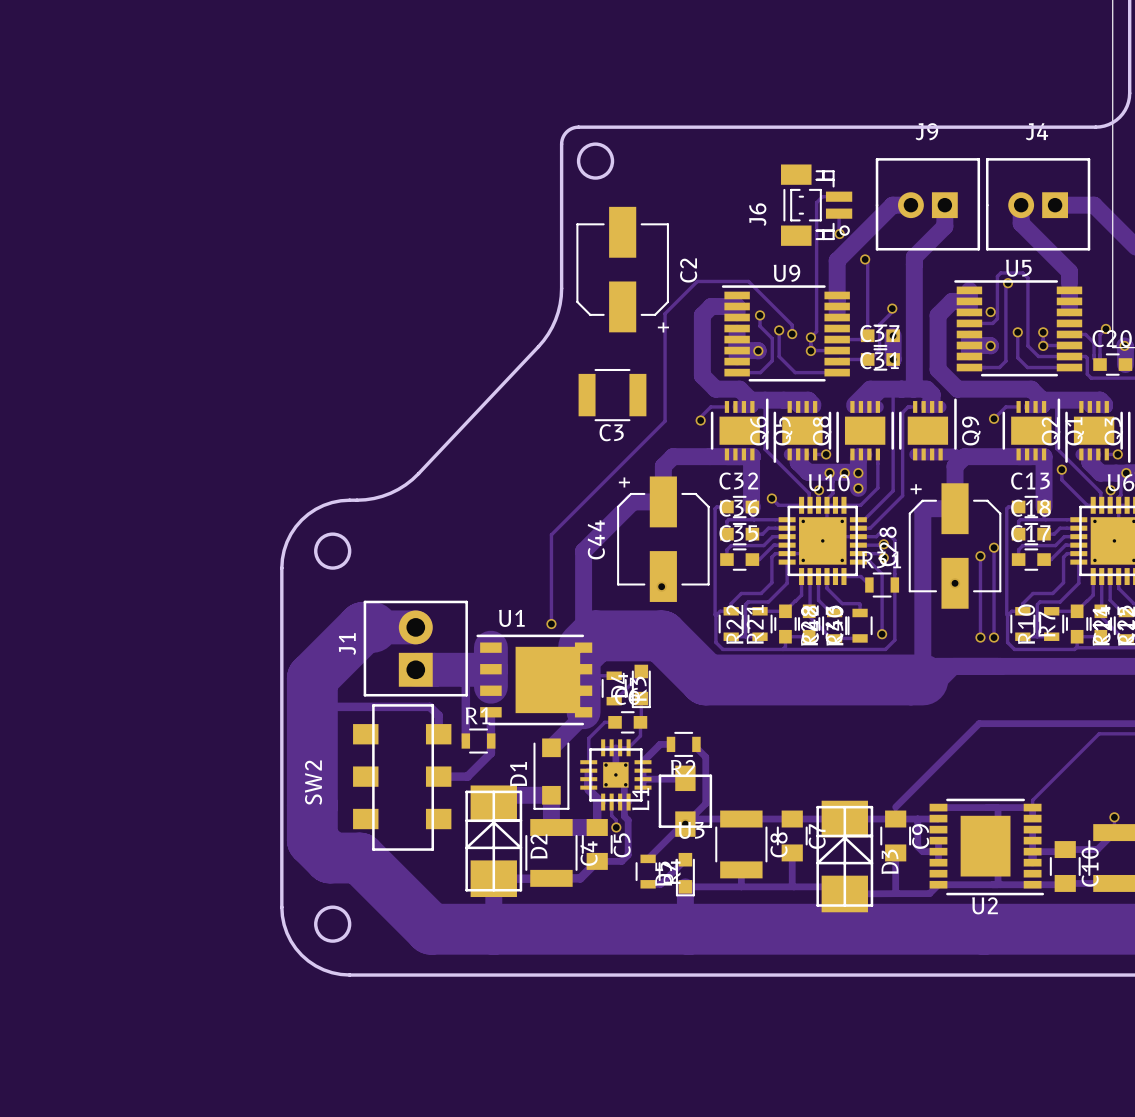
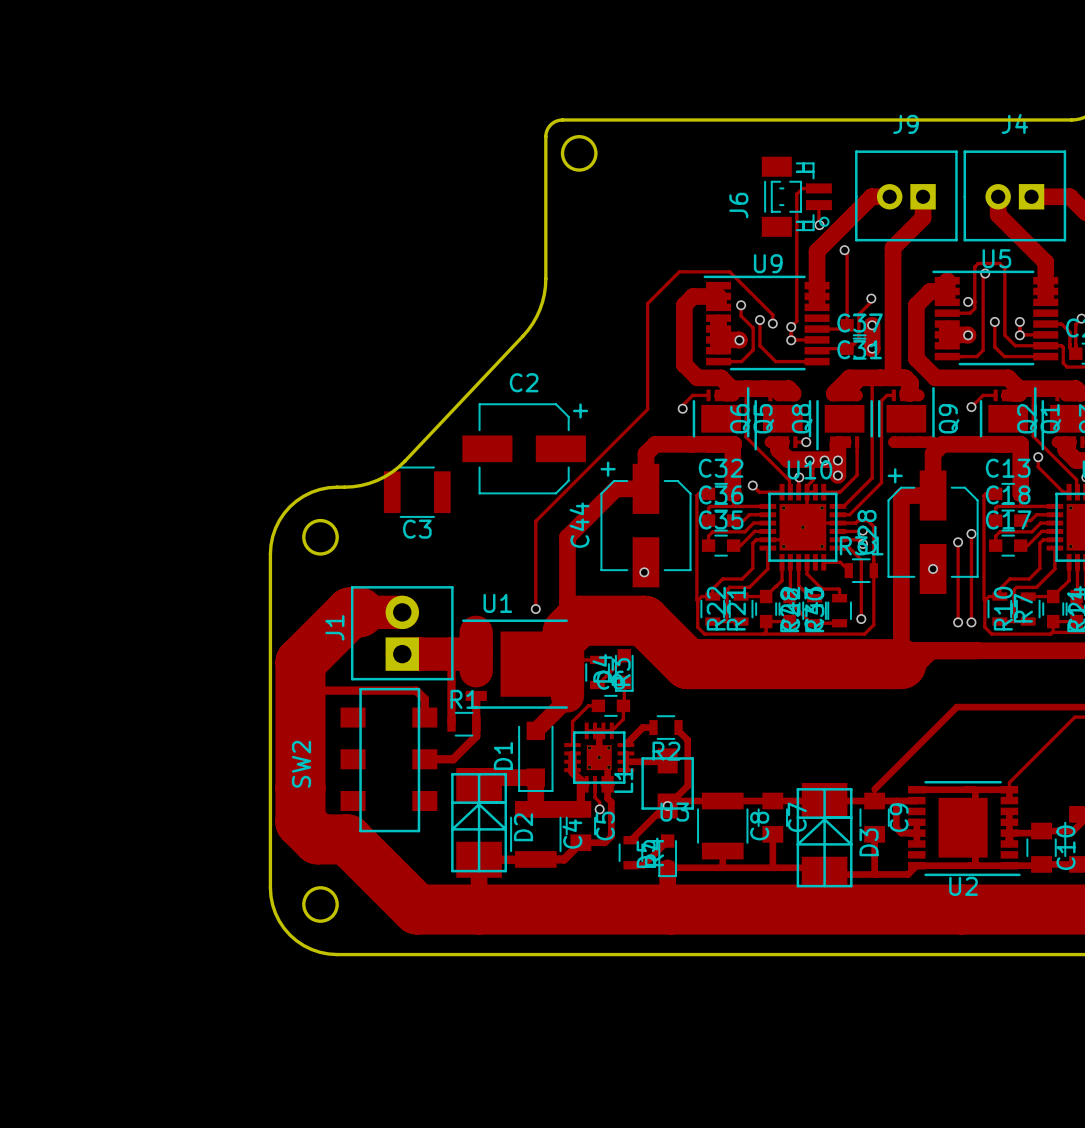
C2 rotation: 0° (622, 269) -> 90° counterclockwise (524, 448)
C2 position: (622, 269) -> (524, 448)
C3 position: (612, 395) -> (417, 492)

